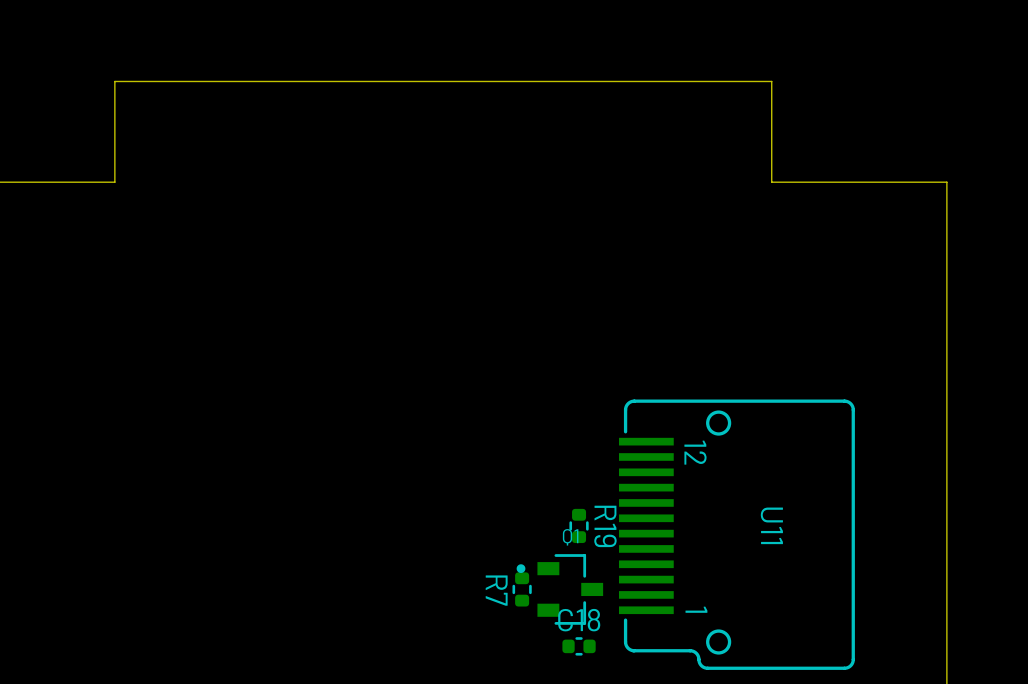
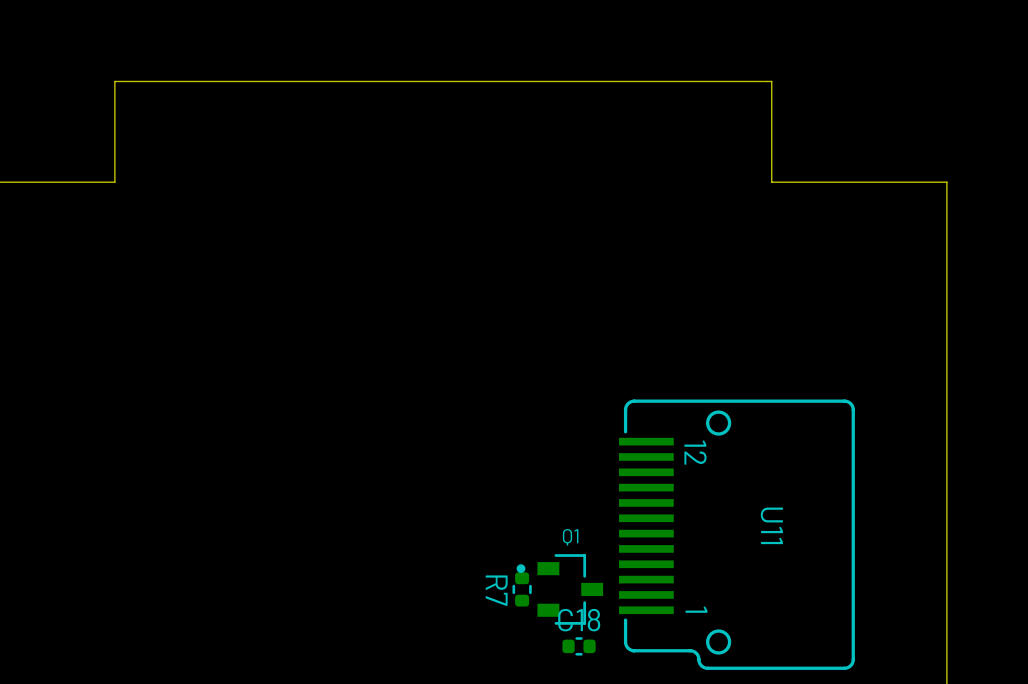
R19: (579, 525) -> none

